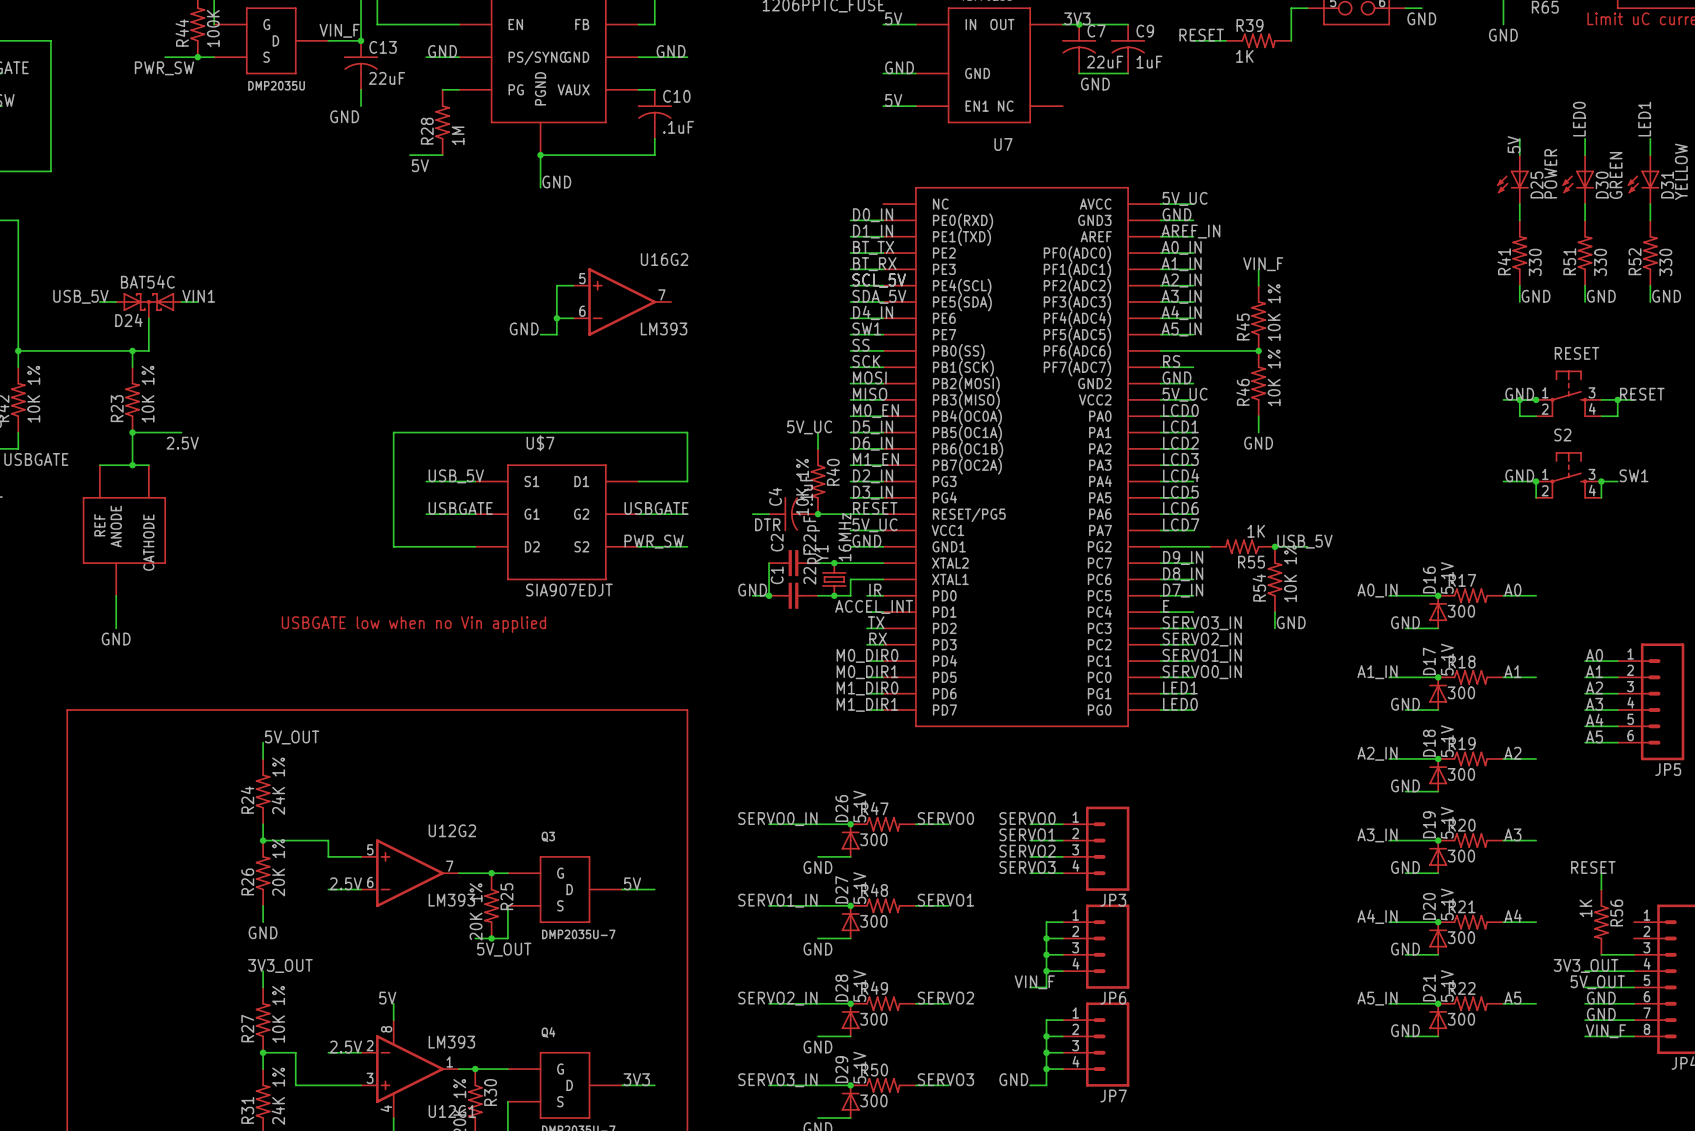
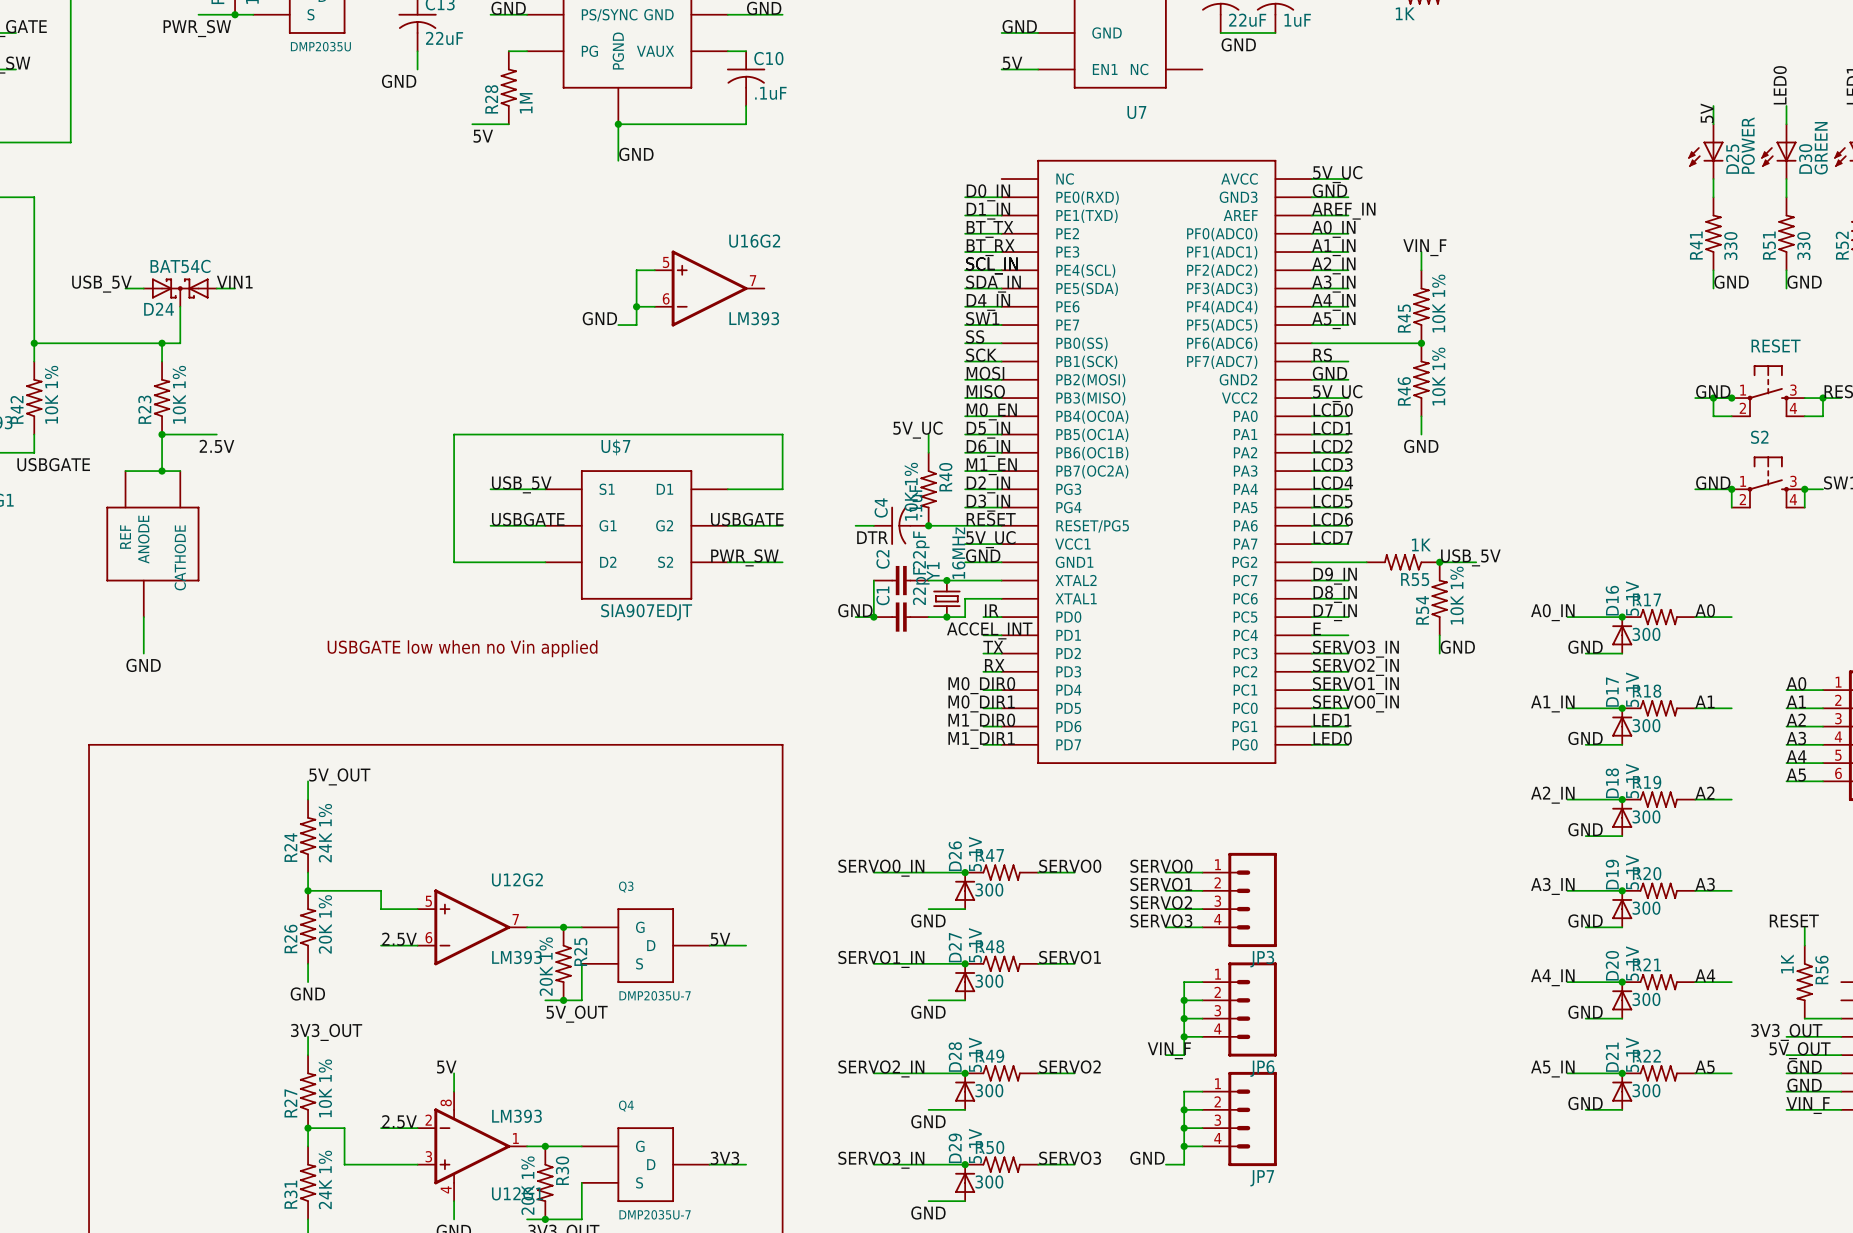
label: SCL_5V (879, 280) -> SCL_IN (991, 265)
label: SDA_5V (879, 296) -> SDA_IN (993, 284)

